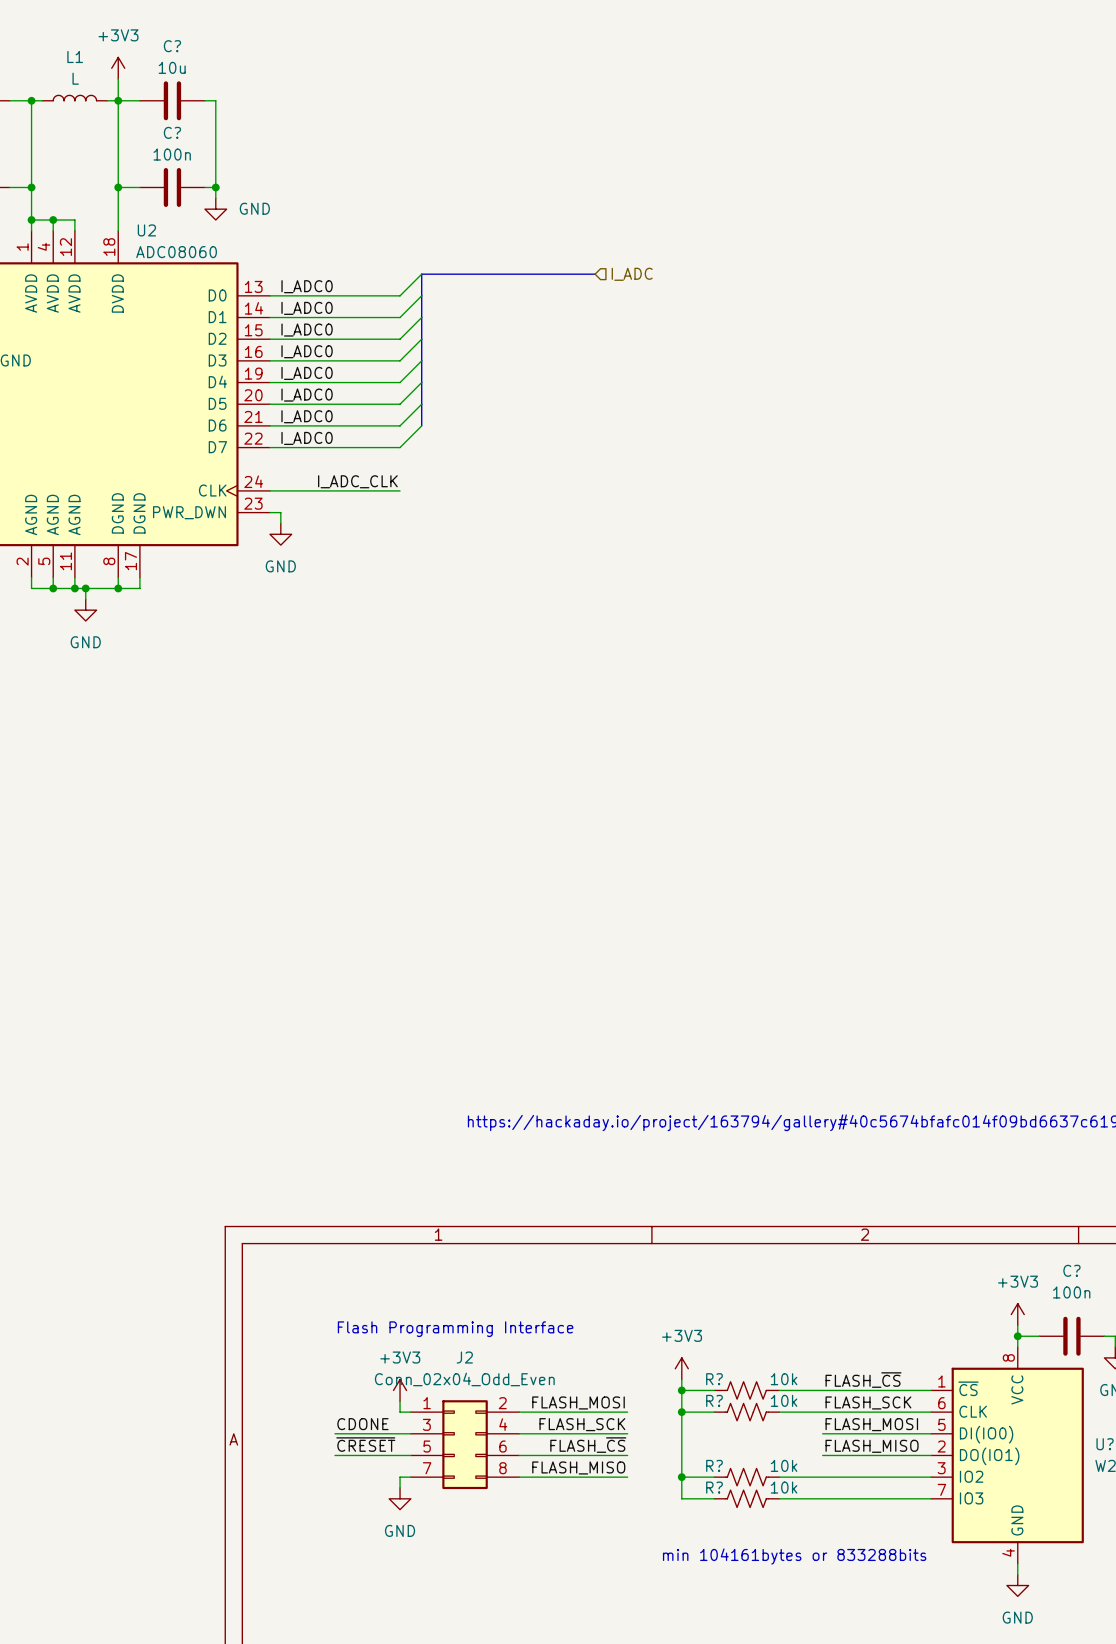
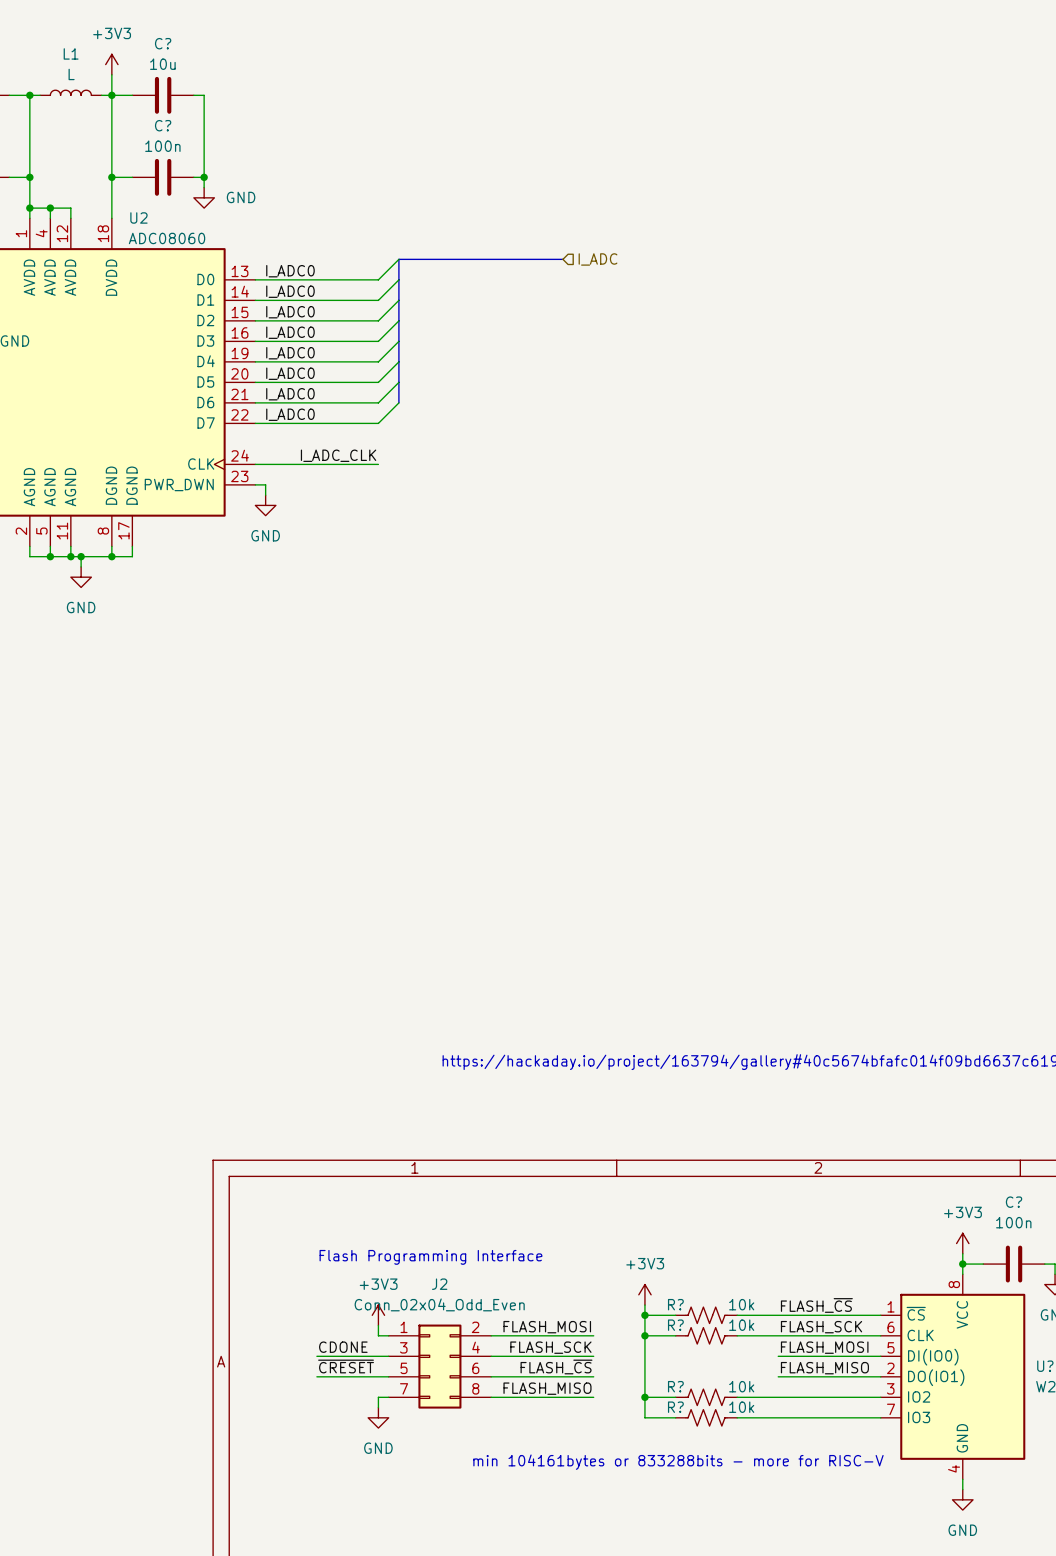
text: min 104161bytes or 833288bits (794, 1556) -> min 104161bytes or 833288bits - more for RISC-V (678, 1462)

